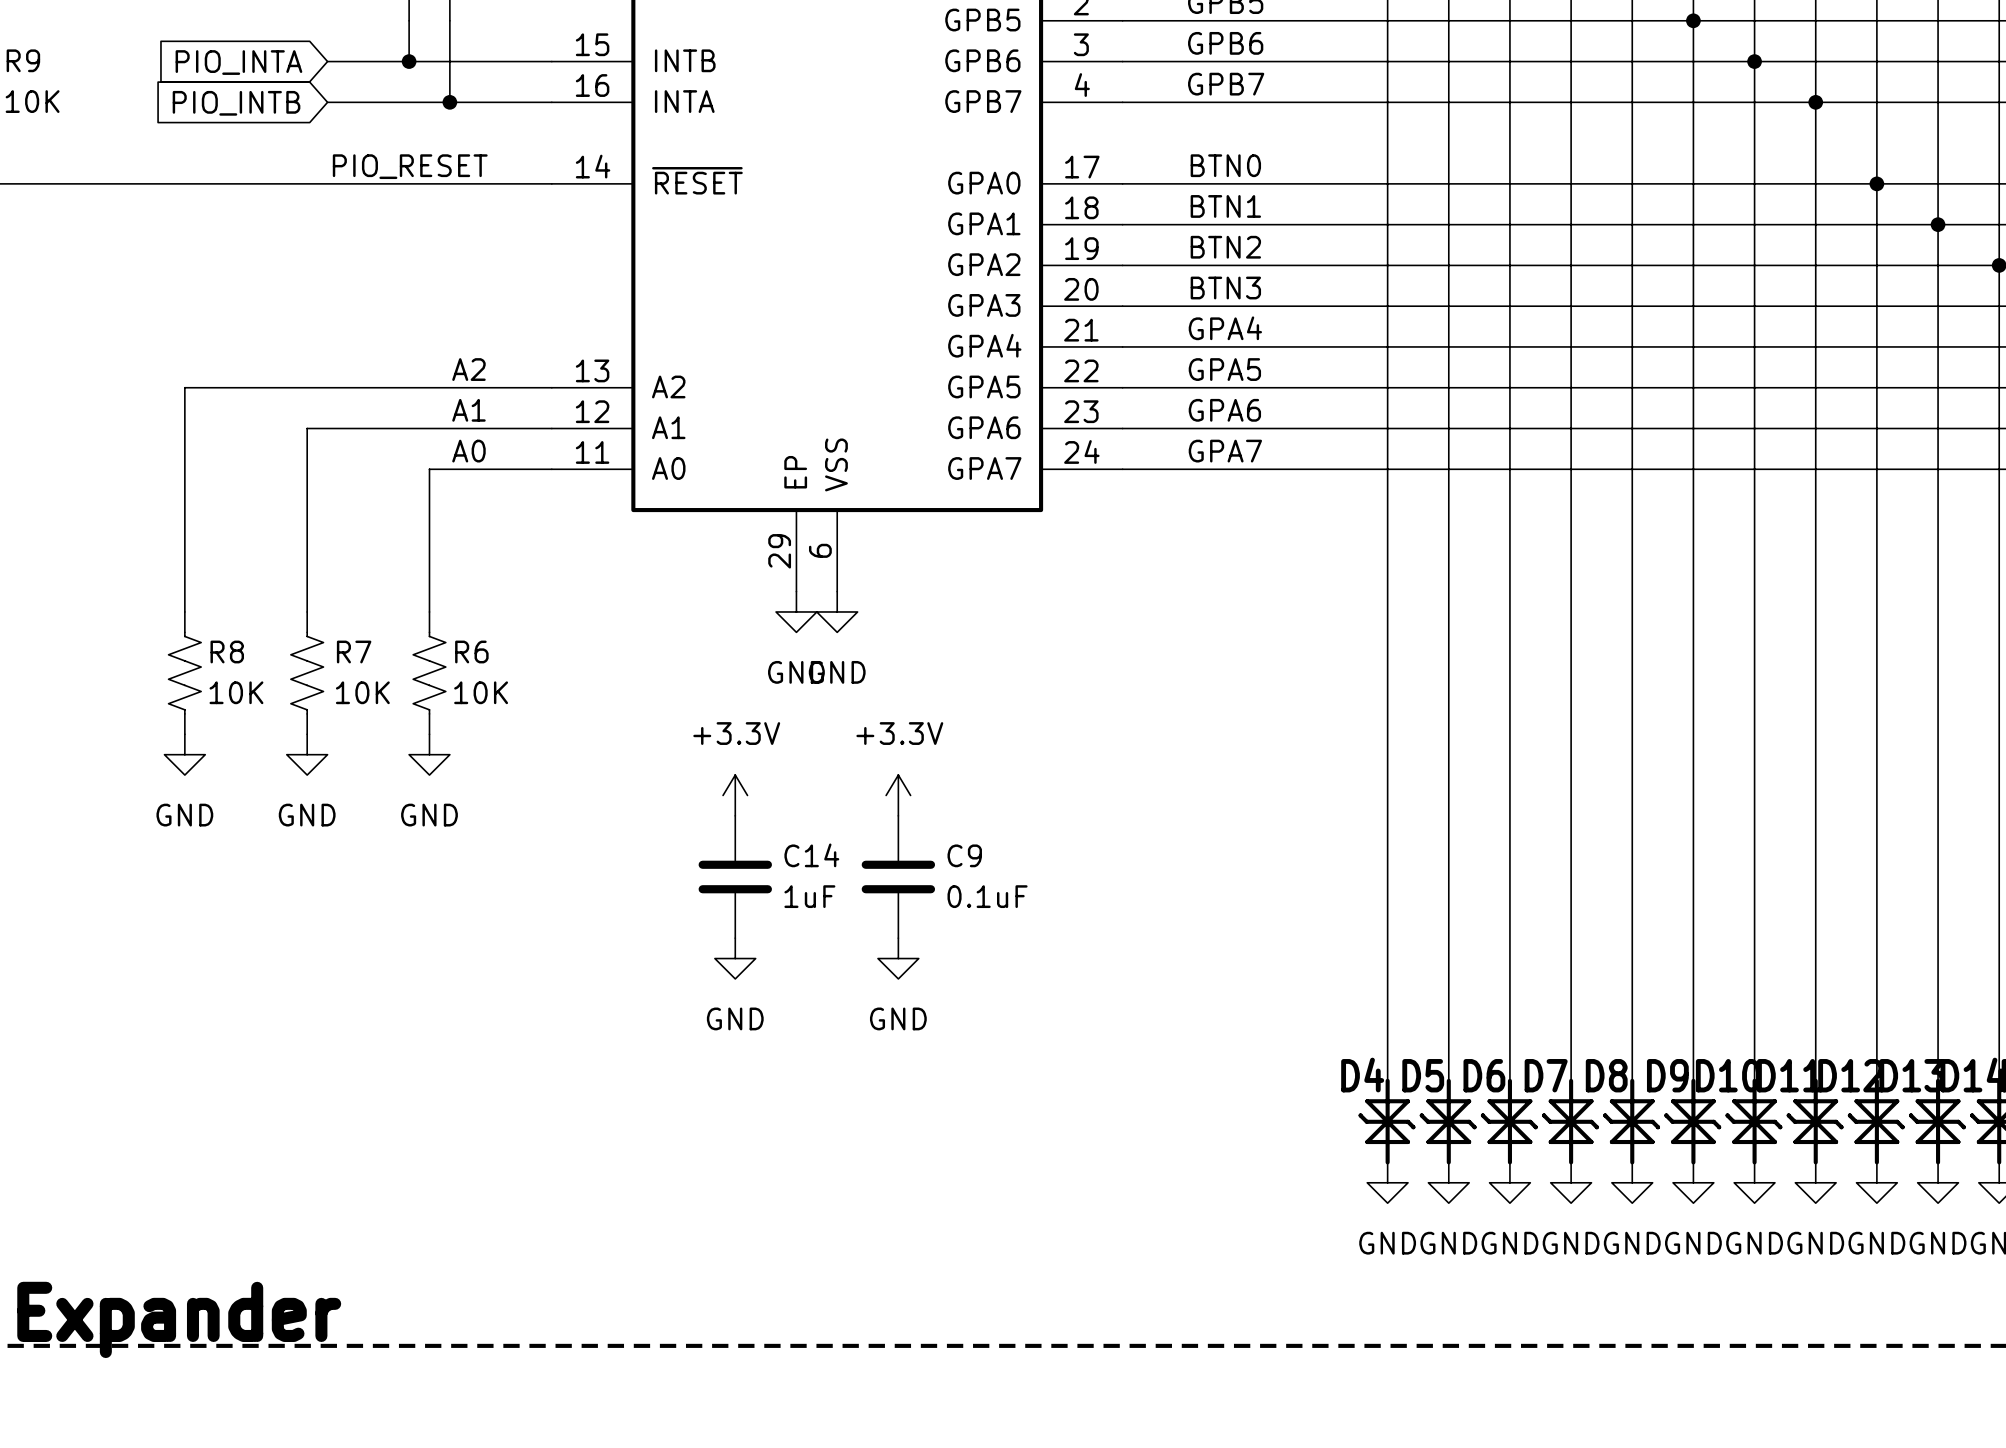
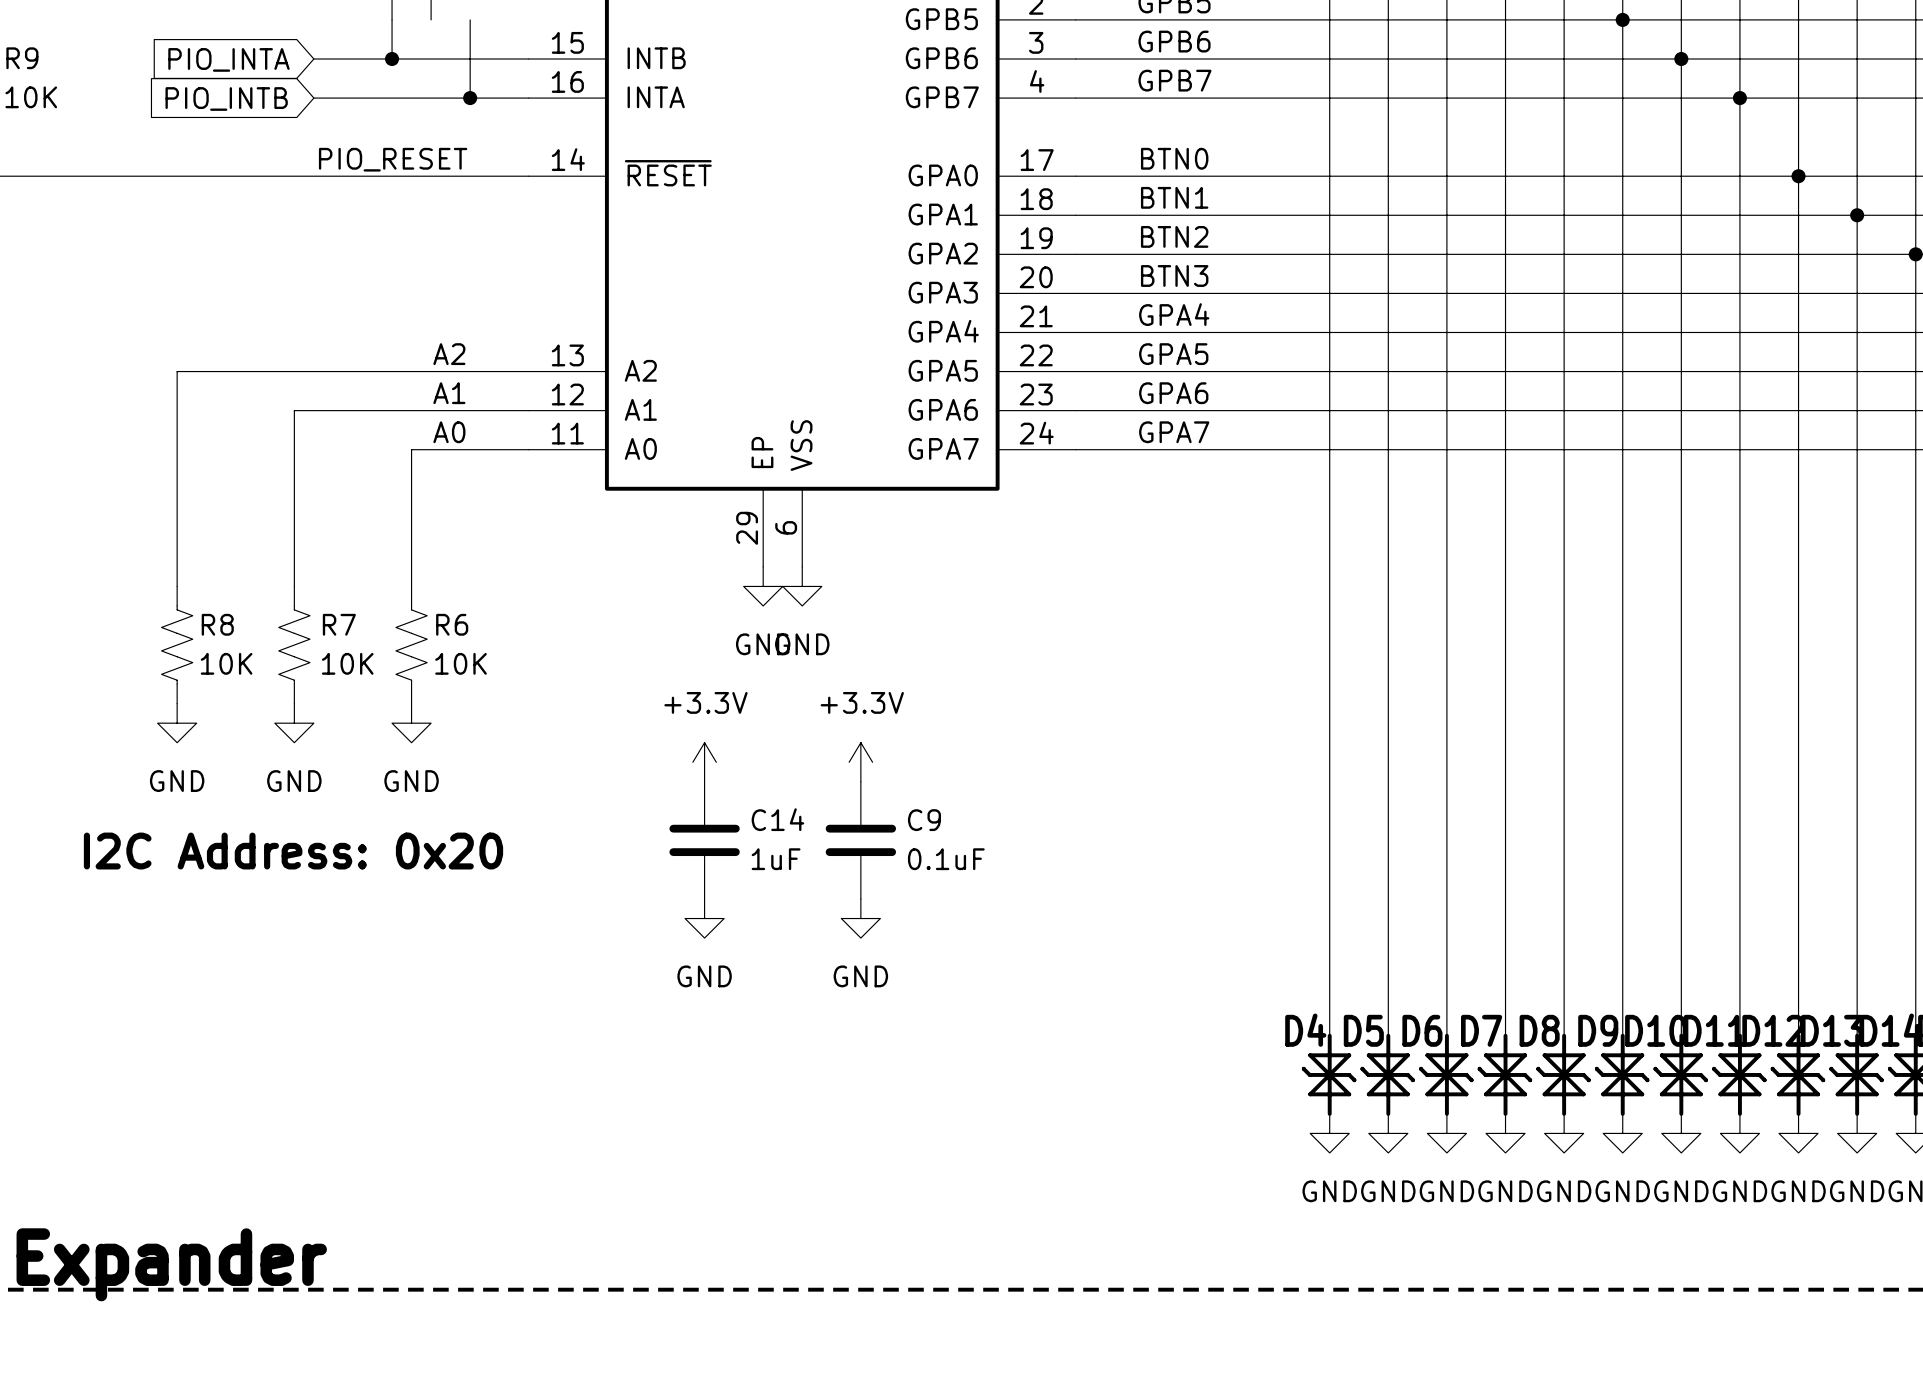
wire: (449, 20) (449, 102) -> (470, 19) (470, 98)
junction position: (449, 102) -> (470, 98)
text: none -> I2C Address: 0x20 (293, 851)

